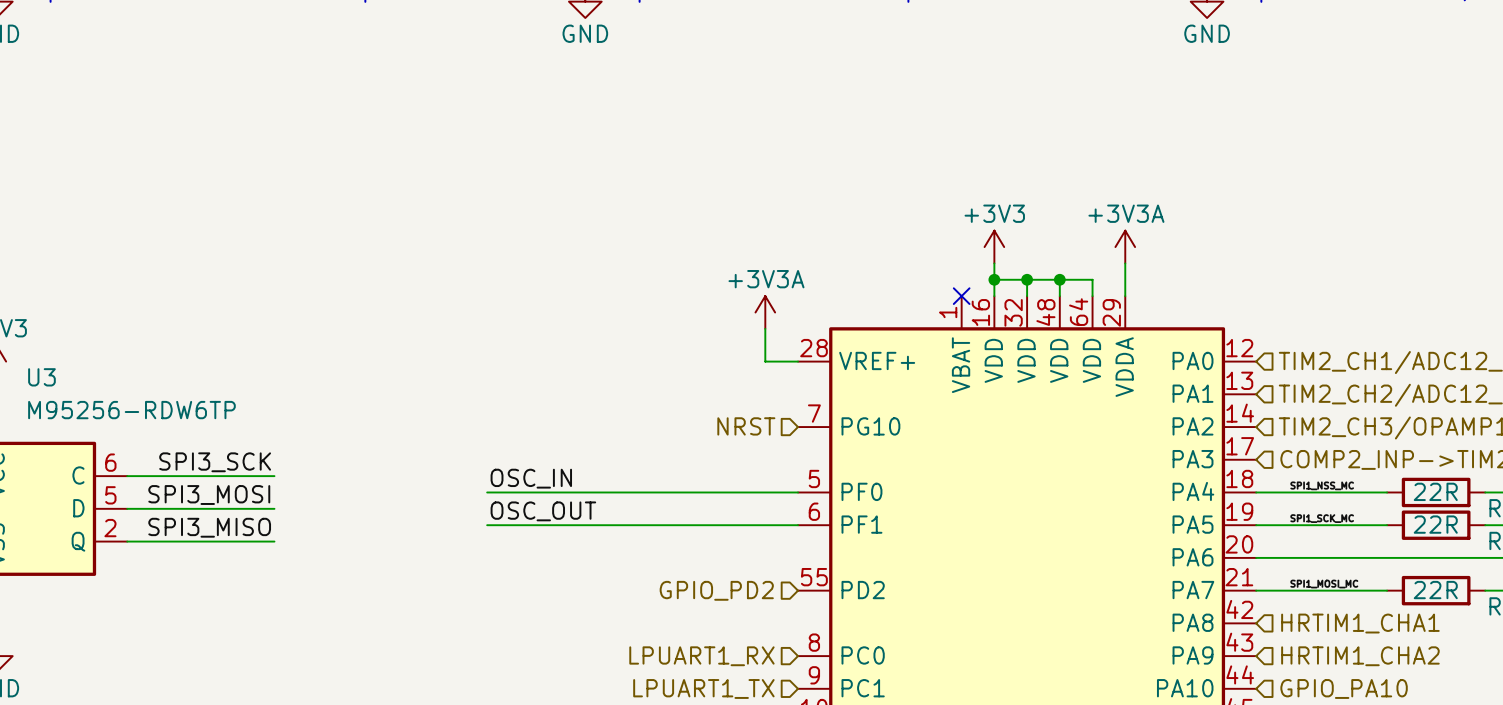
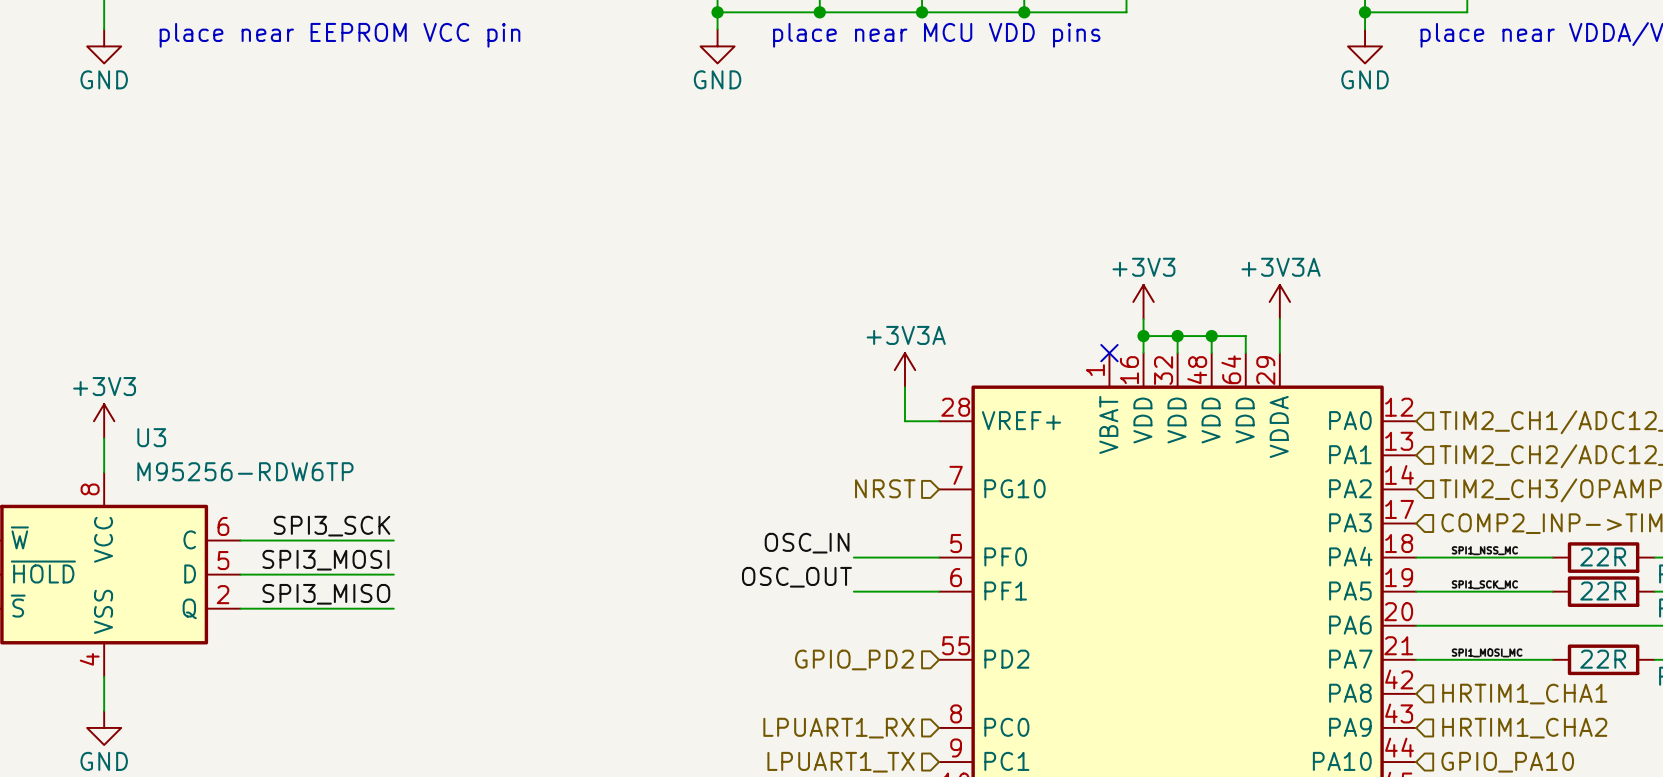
label position: OSC_IN (531, 478) -> OSC_IN (807, 543)
wire: (487, 492) (716, 492) -> none
label position: OSC_OUT (543, 511) -> OSC_OUT (796, 577)
wire: (487, 525) (716, 525) -> none

